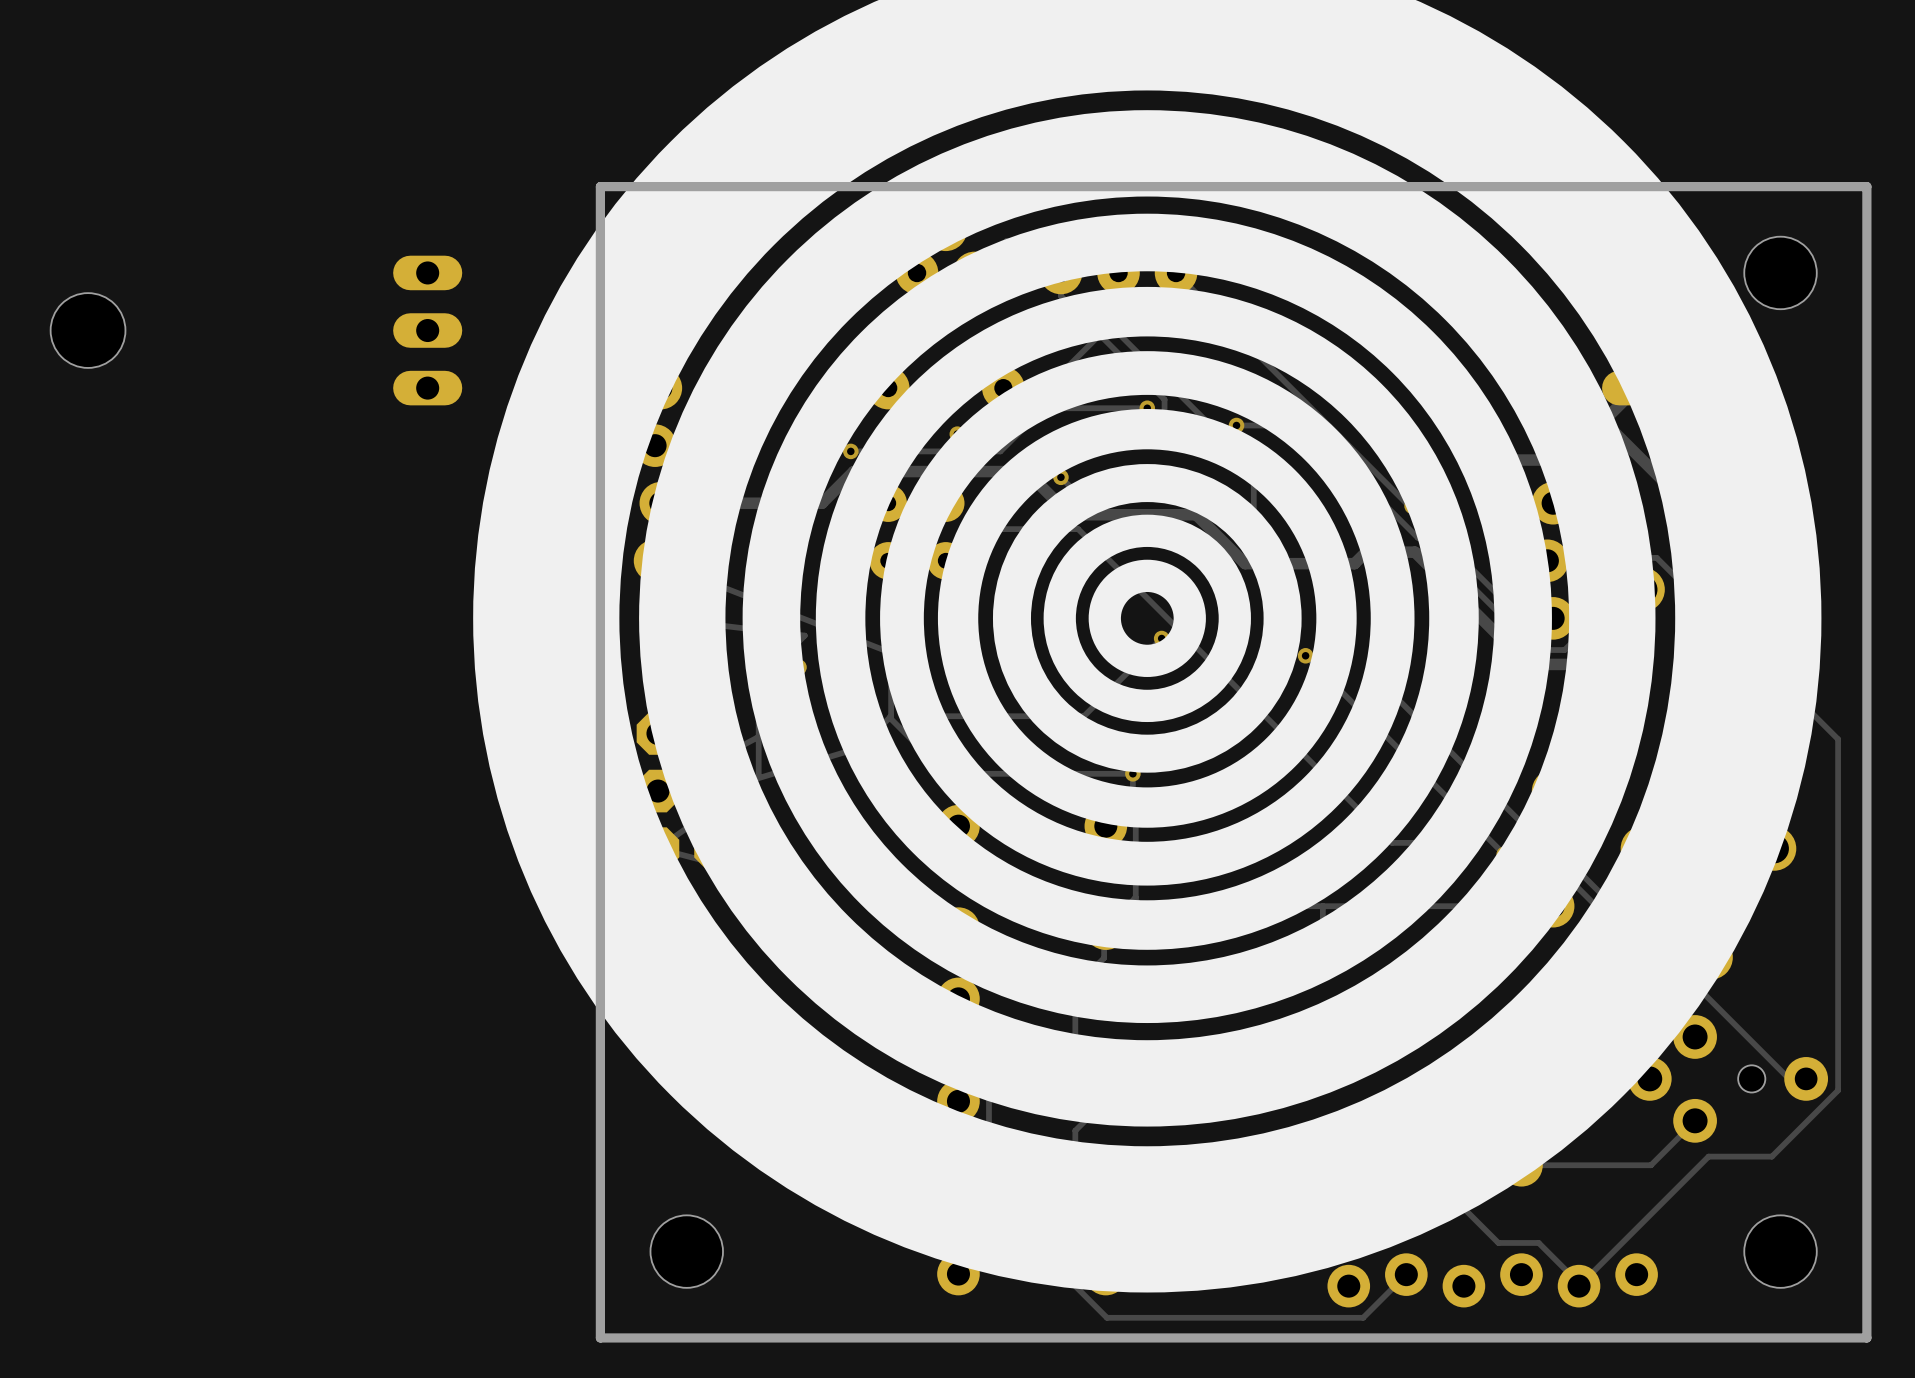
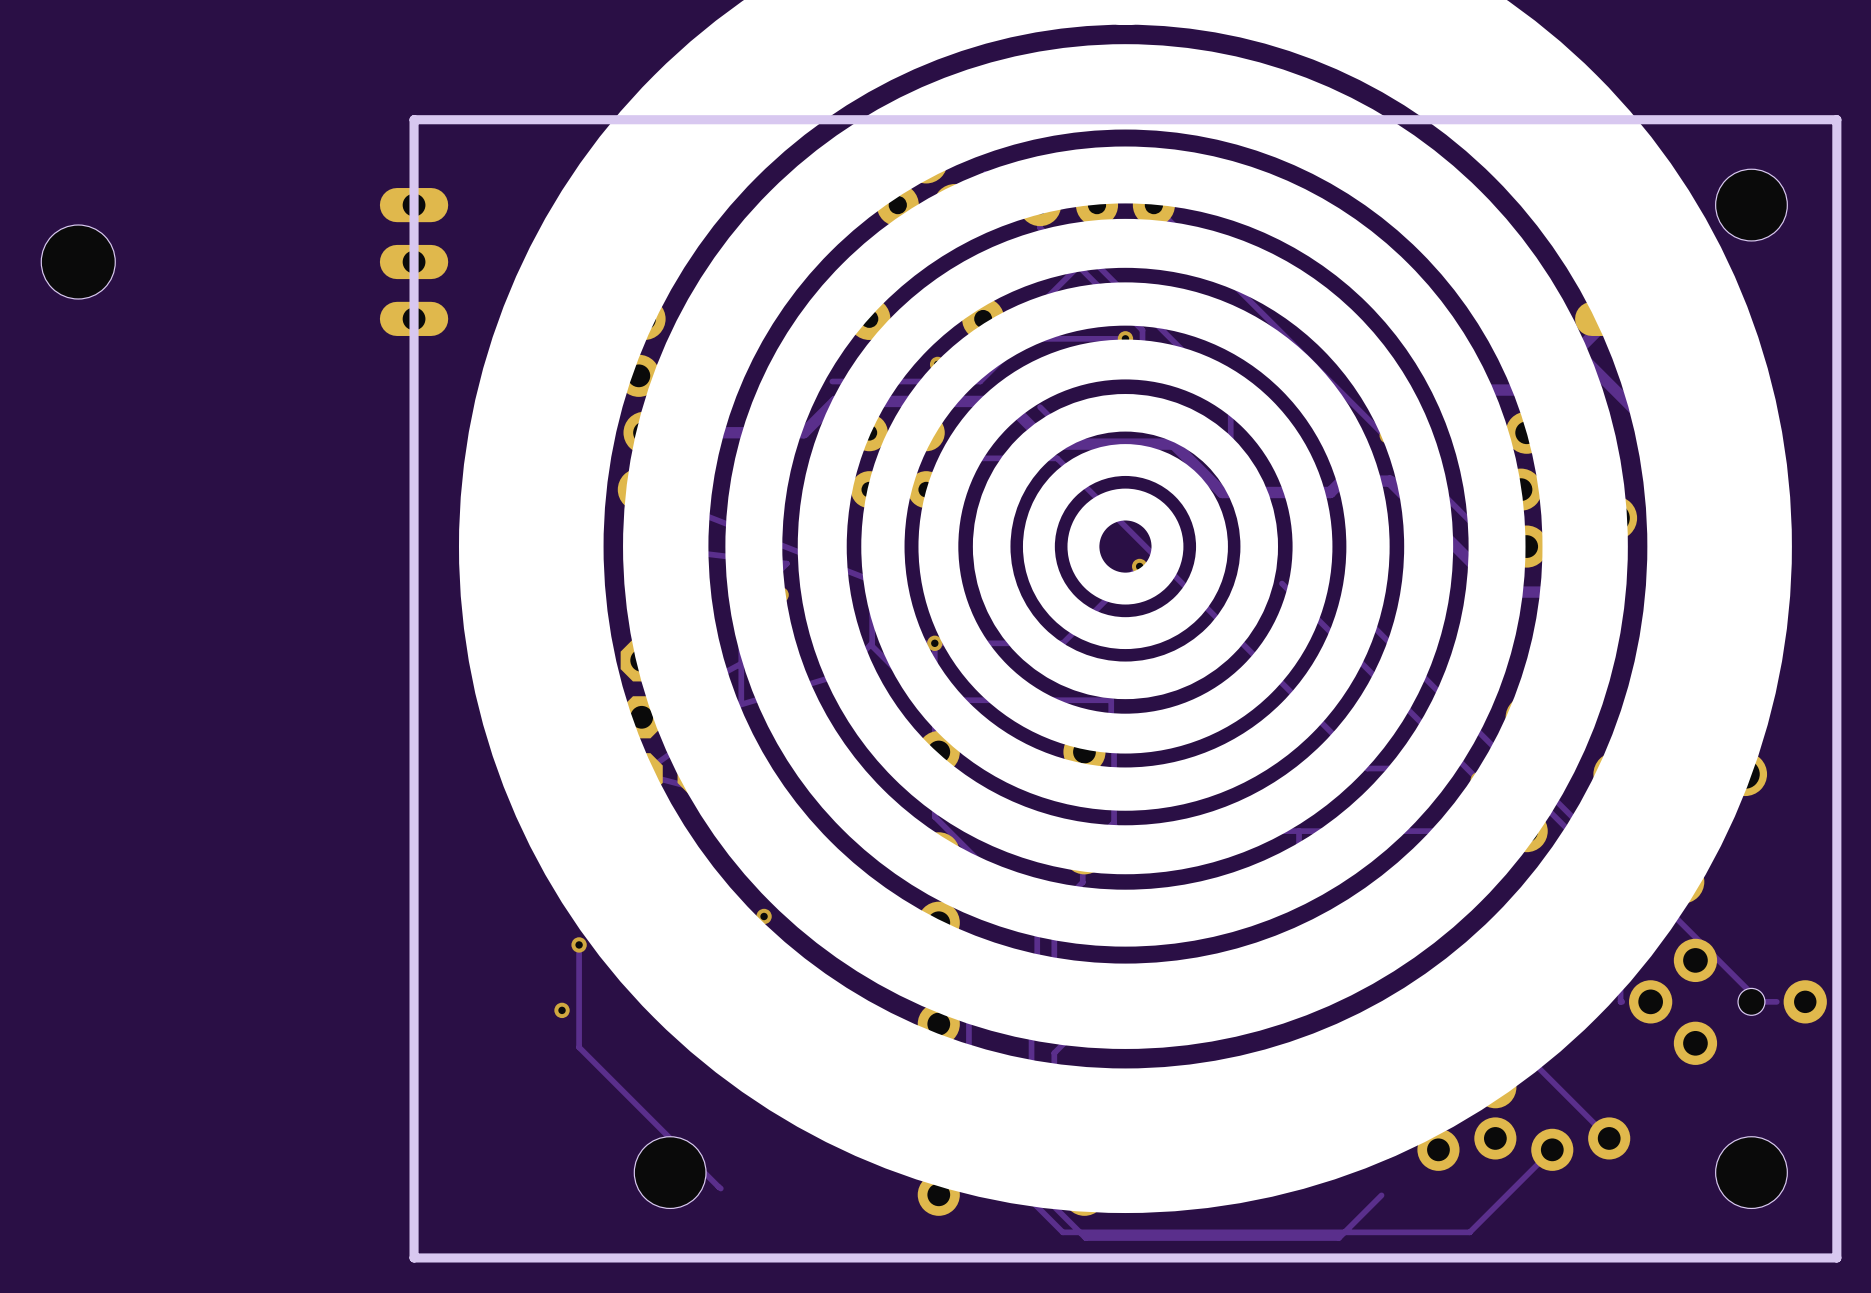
board edge: (600, 186) (600, 1337) -> (584, 119) (414, 119) (414, 1257) (584, 1257)
track: (1236, 425) (1305, 425) (1417, 537) (1423, 537) (1535, 650) (1564, 650) (1610, 603) (1610, 578) (1630, 557) (1656, 557) (1838, 739) (1838, 1090) (1771, 1156) (1708, 1156) (1579, 1286) (1579, 1283) (1538, 1242) (1498, 1242) (1420, 1165) (1348, 1165) -> none
via: (1236, 425) -> none
via: (850, 451) -> none
via: (1060, 477) -> none
via: (1305, 655) -> none
track: none -> (934, 643) (934, 816) (1037, 919) (1037, 1024) (1031, 1030) (1031, 1201) (1062, 1232) (1469, 1232) (1552, 1149)
via: none -> (934, 643)
via: (1132, 773) -> none
via: none -> (764, 916)
track: none -> (579, 944) (579, 1047) (720, 1188)
via: none -> (579, 944)
part position: (1727, 1078) -> (1727, 1001)
via: none -> (562, 1010)
track: none -> (1501, 1030) (1609, 1138)
track: (1695, 1120) (1651, 1165) (1521, 1165) -> none
part position: (1492, 1280) -> (1466, 1144)

